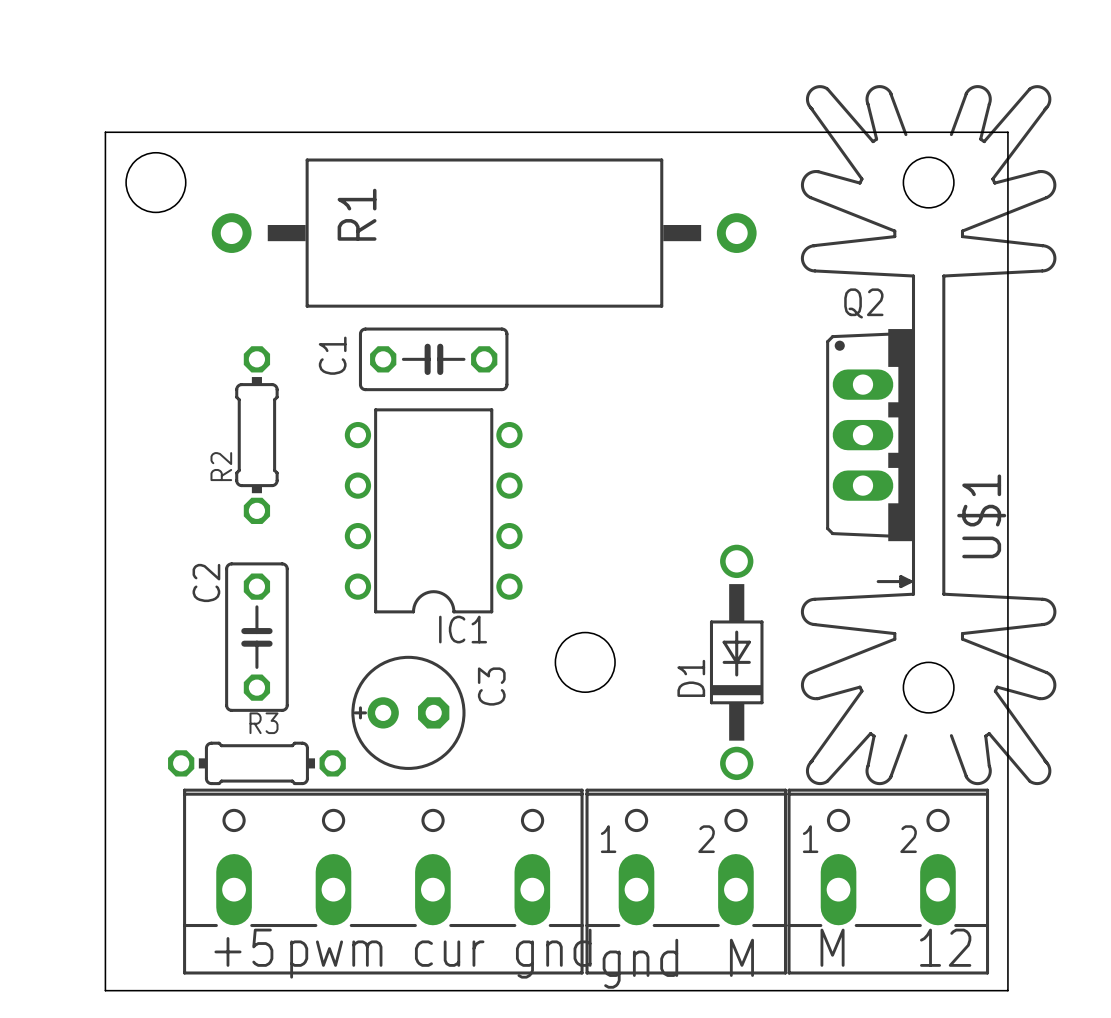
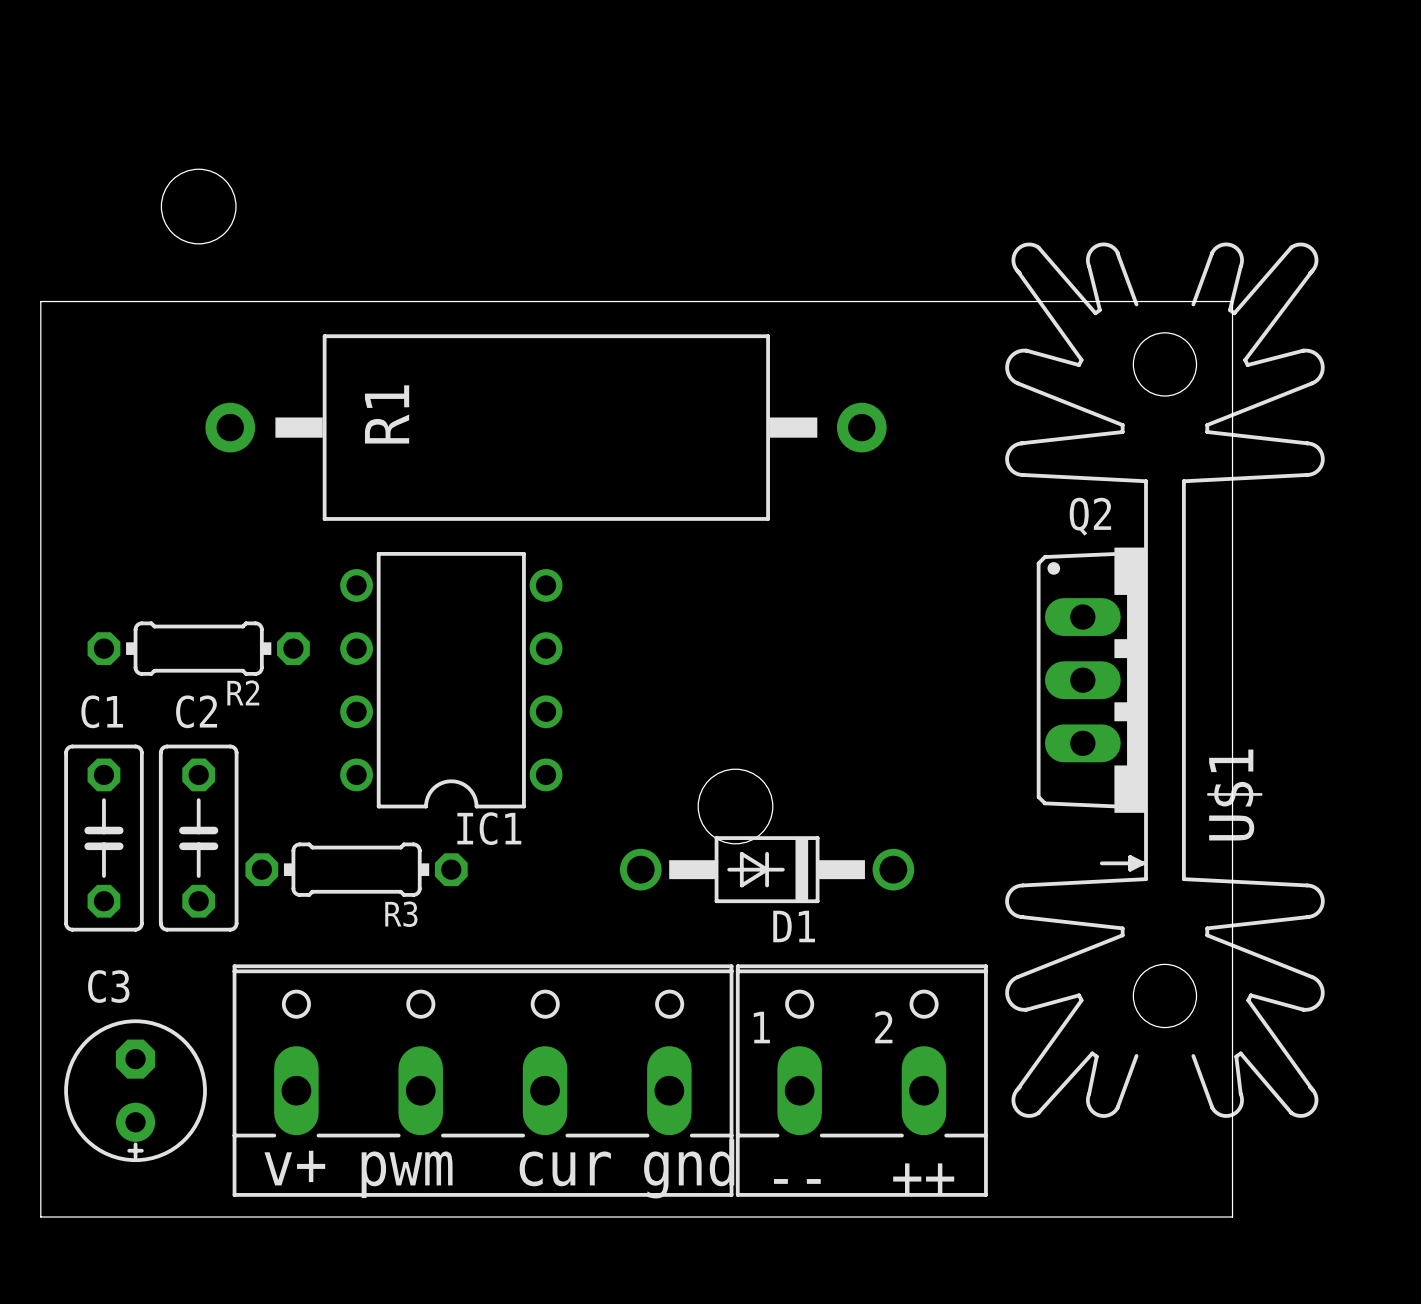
R1 position: (484, 233) -> (546, 427)
C1 rotation: 0° (433, 359) -> 90° clockwise (103, 838)
C1 position: (433, 359) -> (103, 838)
R2 rotation: 0° (256, 435) -> 90° clockwise (198, 648)
R2 position: (256, 435) -> (198, 648)
Q2 position: (869, 435) -> (1091, 680)
U$1 position: (928, 435) -> (1164, 680)
R2 name position: R2 (221, 466) -> R2 (243, 692)
IC1 position: (433, 510) -> (451, 680)
C2 name rotation: 0° (206, 582) -> 90° clockwise (196, 711)
C2 position: (256, 637) -> (198, 838)
D1 rotation: 0° (736, 662) -> 90° counterclockwise (767, 869)
C3 rotation: 0° (408, 712) -> 90° counterclockwise (135, 1090)
C3 position: (408, 712) -> (135, 1090)
R3 name position: R3 (264, 723) -> R3 (401, 914)
R3 position: (256, 763) -> (356, 869)
part: (888, 881) -> none
text: +5 (243, 947) -> v+ (294, 1168)
text: M (832, 947) -> none
text: 12 (945, 947) -> none
text: M (741, 957) -> ++ (923, 1179)
text: none -> -- (797, 1181)
text: gnd (640, 963) -> none
board edge: (105, 990) (105, 132) (1007, 132) (1007, 990) (982, 990) -> (135, 1217) (40, 1217) (40, 301) (1232, 301) (1232, 1217)

